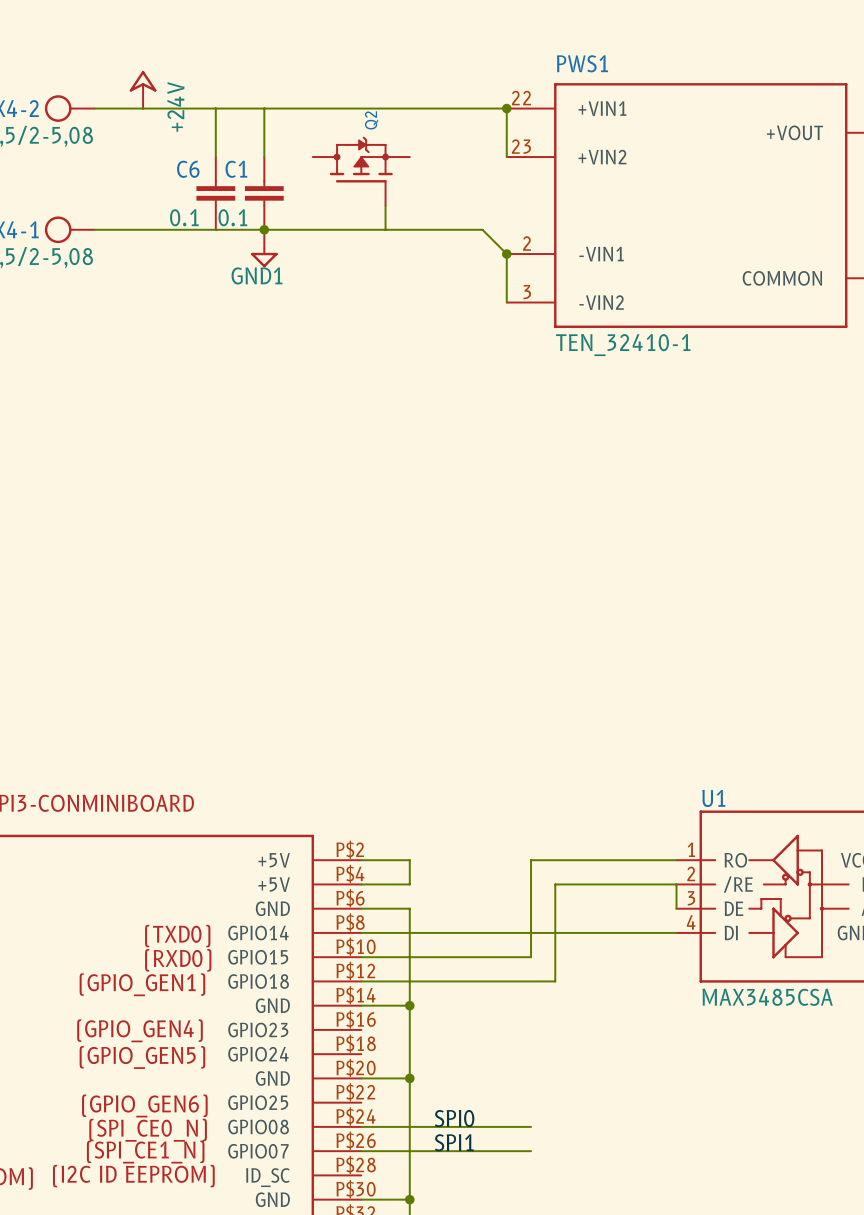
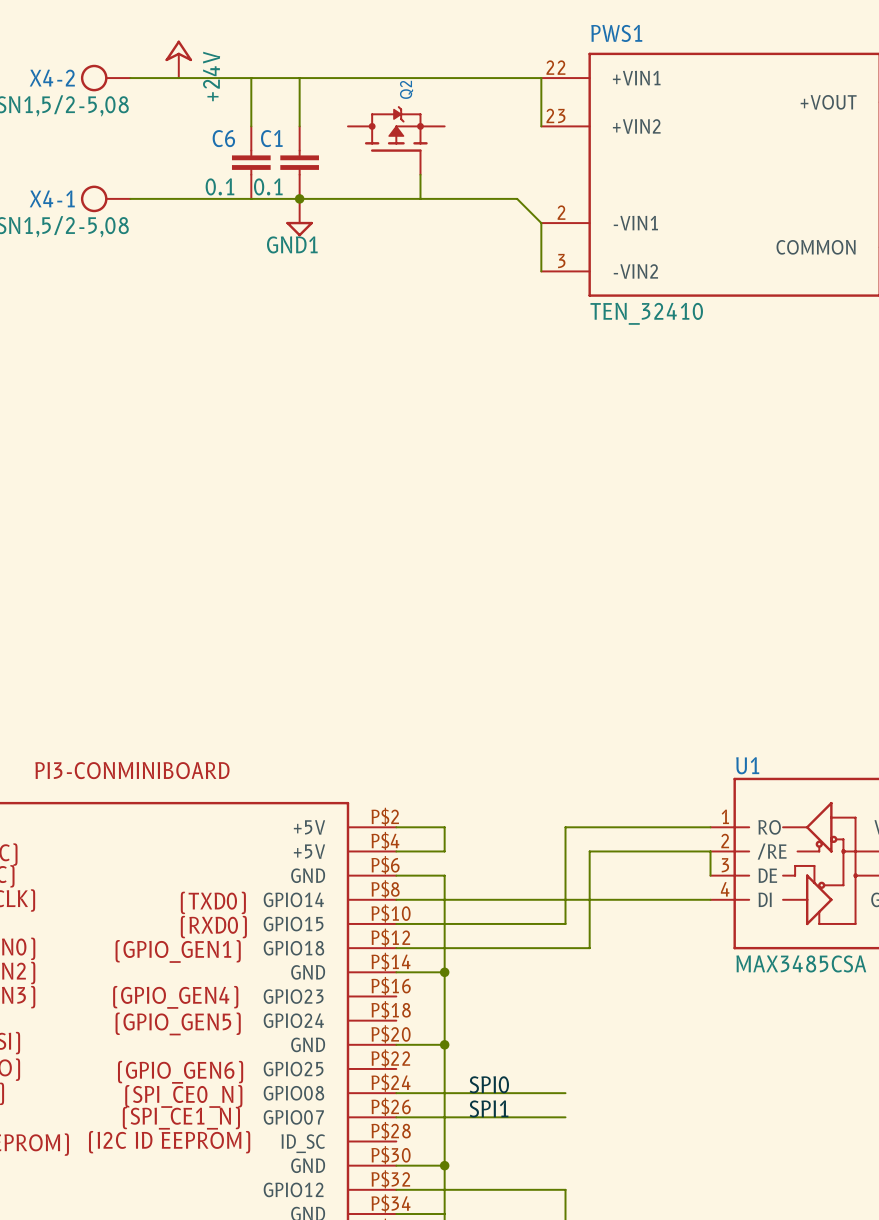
junction: (506, 108) -> none
junction: (506, 254) -> none
PWS1 value: TEN_32410-1 (623, 345) -> TEN_32410 (646, 313)

